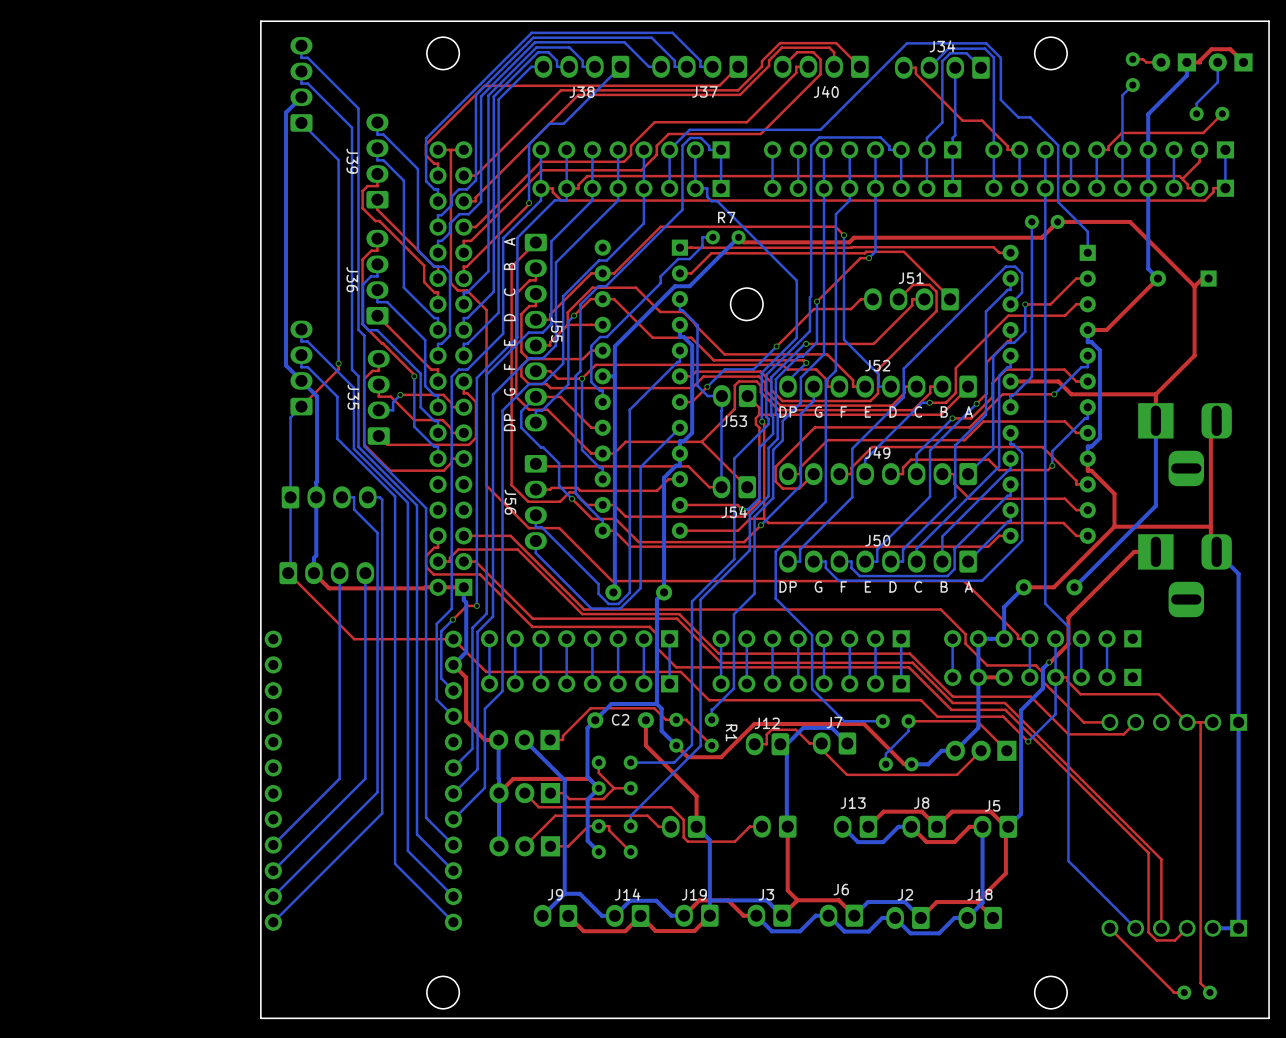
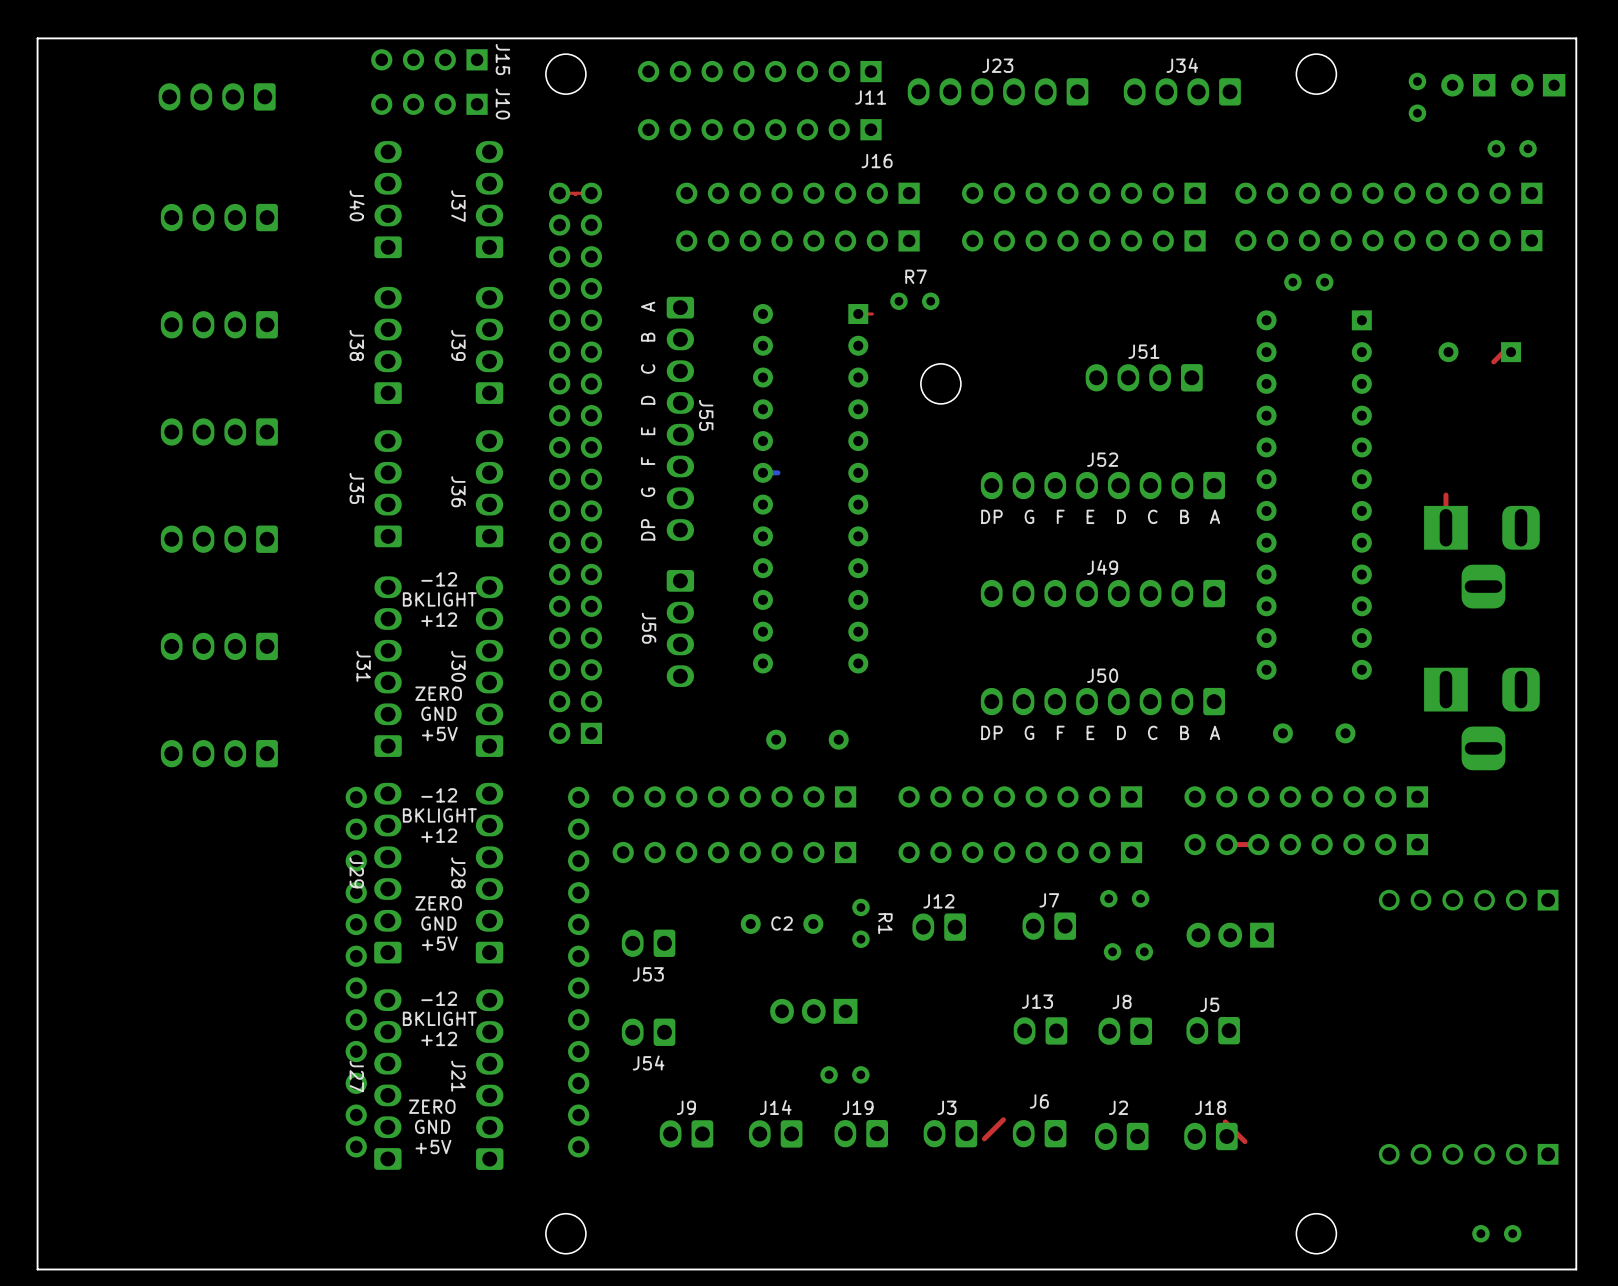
board edge: (1269, 21) (260, 21) (260, 1018) (1269, 1018) (1269, 21) -> (1576, 38) (1576, 1269) (37, 1269) (37, 38) (1576, 38)
J15: none -> (429, 59)
bottom track: (301, 45) (301, 57) (307, 57) (358, 108) (358, 329) (364, 335) (364, 446) (426, 508) (426, 817) (453, 845) -> none
J11: none -> (759, 71)
top track: (1132, 59) (1143, 59) (1146, 62) (1161, 62) -> none
bottom track: (1186, 62) (1186, 75) (1148, 114) (1148, 268) (1157, 278) -> none
bottom track: (1217, 62) (1217, 82) (1196, 103) (1196, 113) -> none
top track: (1243, 62) (1230, 49) (1211, 49) (1200, 62) (1186, 62) -> none
bottom track: (543, 66) (531, 66) (498, 99) (498, 312) (467, 343) (463, 343) (463, 355) -> none
bottom track: (569, 66) (557, 66) (557, 60) (548, 52) (538, 52) (493, 96) (493, 291) (467, 318) (463, 318) (463, 330) -> none
J38 rotation: 0° (581, 66) -> 90° clockwise (388, 345)
J38 position: (581, 66) -> (388, 345)
bottom track: (594, 66) (582, 66) (582, 60) (569, 47) (536, 47) (488, 95) (488, 271) (467, 292) (463, 292) (463, 304) -> none
bottom track: (620, 66) (563, 123) (549, 123) (529, 144) (529, 203) -> none
bottom track: (661, 66) (649, 66) (624, 42) (535, 42) (481, 96) (481, 201) (468, 214) (459, 214) (449, 223) (449, 232) (441, 240) (438, 240) (438, 252) -> none
bottom track: (686, 66) (674, 66) (674, 60) (651, 37) (533, 37) (475, 95) (475, 180) (466, 189) (458, 189) (451, 196) (451, 205) (441, 215) (438, 215) (438, 227) -> none
J37 rotation: 0° (699, 66) -> 90° clockwise (489, 199)
J37 position: (699, 66) -> (489, 199)
bottom track: (712, 66) (700, 66) (700, 60) (672, 32) (531, 32) (426, 138) (426, 181) (434, 189) (438, 189) (438, 201) -> none
top track: (738, 66) (719, 85) (484, 85) (425, 144) (425, 155) (434, 163) (438, 163) (438, 175) -> none
top track: (782, 66) (797, 52) (813, 52) (820, 59) (820, 74) (760, 134) (668, 134) (656, 145) (656, 154) (641, 170) (541, 170) (471, 240) (463, 240) (463, 252) -> none
top track: (808, 66) (796, 66) (796, 72) (746, 122) (654, 122) (631, 145) (631, 154) (624, 161) (540, 161) (475, 227) (463, 227) -> none
J40 rotation: 0° (821, 66) -> 90° clockwise (388, 199)
J40 position: (821, 66) -> (388, 199)
top track: (834, 66) (834, 52) (829, 47) (781, 47) (769, 60) (769, 65) (740, 94) (578, 94) (475, 197) (475, 201) (463, 201) -> none
top track: (859, 66) (836, 43) (779, 43) (762, 61) (762, 66) (738, 90) (560, 90) (475, 175) (463, 175) -> none
J23: none -> (998, 91)
top track: (903, 67) (915, 67) (915, 73) (962, 120) (982, 120) (1007, 146) (1007, 149) (1019, 149) -> none
bottom track: (929, 67) (948, 48) (984, 48) (993, 57) (993, 188) -> none
bottom track: (955, 67) (952, 188) -> none
bottom track: (980, 67) (966, 53) (950, 53) (942, 61) (942, 122) (926, 137) (926, 188) -> none
part: none -> (217, 96)
bottom track: (301, 71) (301, 83) (307, 83) (352, 127) (352, 369) (358, 376) (358, 446) (417, 505) (417, 834) (453, 870) -> none
J10: none -> (429, 104)
part: (301, 84) -> none
bottom track: (1132, 85) (1122, 95) (1122, 188) -> none
bottom track: (301, 97) (286, 112) (286, 365) (317, 396) (316, 555) (313, 557) (313, 573) -> none
J16: none -> (759, 129)
top track: (1222, 113) (1203, 132) (1121, 132) (1108, 146) (1108, 149) (1096, 149) -> none
bottom track: (301, 122) (338, 160) (338, 363) -> none
bottom track: (377, 122) (377, 134) (383, 134) (417, 169) (417, 250) (434, 266) (443, 266) (449, 272) (449, 335) (441, 343) (438, 343) (438, 355) -> none
bottom track: (377, 148) (377, 160) (383, 160) (403, 180) (403, 287) (434, 318) (438, 318) (438, 330) -> none
bottom track: (540, 149) (540, 200) (503, 238) (503, 333) (467, 369) (458, 369) (451, 376) (451, 608) (436, 623) (436, 699) (453, 716) -> none
bottom track: (566, 149) (566, 200) (554, 200) (517, 237) (517, 337) (476, 377) (476, 605) -> none
bottom track: (592, 149) (592, 200) (551, 241) (551, 323) (542, 332) (528, 332) (486, 374) (486, 613) (472, 627) (472, 748) (453, 767) -> none
bottom track: (618, 149) (618, 200) (555, 262) (555, 345) (543, 358) (529, 358) (492, 394) (492, 616) (477, 631) (477, 769) (453, 793) -> none
bottom track: (643, 149) (643, 223) (606, 260) (598, 260) (563, 296) (563, 363) (542, 384) (529, 384) (502, 410) (502, 691) (484, 708) (484, 787) (453, 819) -> none
bottom track: (695, 149) (695, 188) (707, 188) (707, 196) (711, 201) (717, 201) (796, 280) (796, 337) (761, 372) (762, 421) -> none
bottom track: (772, 149) (772, 188) -> none
bottom track: (798, 149) (798, 188) -> none
bottom track: (824, 149) (824, 354) (800, 377) (800, 402) (782, 421) (782, 440) (773, 449) (773, 498) (754, 516) (754, 593) (733, 614) (733, 688) (711, 709) (711, 719) -> none
bottom track: (849, 149) (849, 200) (835, 214) (835, 370) (825, 380) (825, 501) (775, 551) (775, 598) (812, 634) (812, 689) (844, 721) (882, 721) -> none
bottom track: (875, 149) (875, 251) (868, 258) -> none
bottom track: (1019, 149) (1019, 188) -> none
bottom track: (1045, 149) (1045, 603) (1068, 626) (1068, 861) (1135, 928) -> none
bottom track: (1071, 149) (1071, 188) -> none
bottom track: (1096, 149) (1096, 188) -> none
bottom track: (1173, 149) (1173, 188) -> none
top track: (1199, 149) (1199, 161) (1182, 179) -> none
bottom track: (1225, 149) (1225, 188) -> none
top track: (450, 150) (450, 283) (457, 290) (466, 290) (486, 310) (486, 485) (528, 528) (559, 528) (612, 581) (963, 581) (1017, 635) (1017, 638) (1029, 638) -> none
J39 position: (377, 161) -> (489, 345)
part: none -> (219, 217)
top track: (377, 174) (377, 186) (367, 186) (362, 191) (362, 208) (375, 221) (379, 221) (424, 265) (424, 282) (434, 292) (438, 292) (438, 304) -> none
bottom track: (669, 188) (669, 149) (689, 129) (820, 129) (906, 43) (986, 43) (1000, 57) (1000, 99) (1018, 117) (1030, 117) (1058, 145) (1058, 202) (1087, 231) (1087, 252) -> none
bottom track: (721, 188) (721, 149) (709, 149) (709, 146) (700, 137) (690, 137) (682, 145) (682, 209) (605, 286) (598, 286) (580, 304) (580, 371) (575, 376) (575, 493) (602, 519) (602, 530) -> none
bottom track: (901, 188) (901, 149) (889, 149) (889, 146) (880, 137) (819, 137) (811, 145) (809, 331) (766, 374) (766, 416) (768, 419) (768, 424) (734, 458) (734, 559) (691, 601) (691, 744) (674, 762) (630, 762) -> none
top track: (1199, 188) (1187, 188) (1187, 184) (1179, 176) (587, 176) (578, 184) (578, 188) (566, 188) -> none
top track: (1225, 188) (1213, 188) (1213, 191) (1204, 200) (561, 200) (552, 192) (552, 188) (540, 188) -> none
top track: (377, 199) (377, 209) (434, 266) (438, 266) (438, 278) -> none
top track: (529, 203) (466, 266) (463, 266) (463, 278) -> none
via: (529, 203) -> none
bottom track: (1031, 221) (1031, 376) (1012, 395) (1010, 395) (1010, 407) -> none
top track: (843, 235) (835, 226) (660, 226) (614, 273) (591, 273) (550, 314) (550, 319) (535, 319) -> none
bottom track: (843, 235) (843, 339) (878, 374) (878, 386) (890, 386) -> none
via: (843, 235) -> none
bottom track: (712, 237) (702, 237) (702, 246) (689, 259) (678, 259) (660, 276) (660, 283) (606, 336) (600, 336) (591, 345) (591, 382) (599, 390) (602, 390) (602, 402) -> none
top track: (738, 237) (743, 242) (849, 242) (853, 237) (1041, 237) (1057, 221) (1130, 221) (1194, 286) (1194, 355) (1155, 394) (1071, 394) (1058, 381) (1010, 381) -> none
bottom track: (738, 237) (689, 286) (674, 286) (614, 346) (613, 592) -> none
top track: (377, 238) (377, 250) (371, 250) (362, 259) (362, 324) (414, 376) -> none
top track: (535, 242) (511, 266) (511, 485) (528, 501) (560, 501) (569, 492) (574, 492) (587, 504) (614, 504) (625, 516) (744, 516) (759, 501) (759, 427) (755, 424) (755, 418) (759, 414) -> none
top track: (691, 247) (993, 247) (999, 252) (1010, 252) -> none
part: none -> (219, 324)
top track: (868, 258) (860, 258) (816, 301) -> none
via: (868, 258) -> none
bottom track: (377, 264) (377, 276) (371, 276) (363, 284) (363, 324) (368, 330) (377, 330) (420, 373) (420, 407) (434, 421) (438, 421) (438, 432) -> none
top track: (535, 268) (535, 280) (529, 280) (516, 293) (516, 397) (529, 409) (547, 409) (591, 453) (614, 453) (625, 441) (701, 441) -> none
top track: (679, 273) (691, 273) (711, 253) (903, 251) (950, 299) -> none
J36 position: (377, 277) -> (489, 488)
bottom track: (1010, 278) (1010, 289) (1007, 289) (985, 311) (985, 414) (955, 445) (955, 497) (903, 549) (903, 561) (890, 561) -> none
top track: (1087, 278) (1076, 278) (1050, 304) (1025, 304) -> none
top track: (1157, 278) (1106, 330) (1087, 330) -> none
bottom track: (377, 290) (377, 302) (387, 302) (425, 340) (425, 386) (434, 395) (438, 395) (438, 407) -> none
top track: (535, 293) (535, 306) (529, 306) (521, 314) (521, 351) (528, 359) -> none
bottom track: (679, 299) (679, 310) (682, 310) (697, 325) (697, 385) (707, 396) (721, 396) (721, 487) -> none
top track: (872, 299) (860, 299) (851, 309) (814, 309) (776, 346) -> none
top track: (898, 299) (913, 284) (929, 284) (936, 291) (936, 311) (878, 369) (878, 393) (870, 401) (782, 401) (771, 389) (771, 382) (760, 371) (695, 371) (691, 376) (679, 376) -> none
top track: (924, 299) (912, 299) (912, 305) (873, 343) (806, 343) -> none
bottom track: (816, 301) (816, 342) (802, 356) (798, 356) (775, 379) (777, 438) (768, 447) (768, 496) (749, 514) (749, 550) (700, 599) (700, 745) (630, 815) (630, 826) -> none
via: (816, 301) -> none
bottom track: (1010, 304) (1022, 292) (1022, 273) (1015, 266) (1005, 266) (903, 368) (903, 397) (852, 448) (852, 497) (800, 549) (800, 561) (787, 561) -> none
bottom track: (1025, 304) (1025, 331) (1014, 342) (1006, 342) (993, 356) (993, 449) (968, 474) -> none
via: (1025, 304) -> none
top track: (1087, 304) (1076, 304) (1064, 315) (1008, 315) (955, 368) (955, 392) (946, 402) (929, 402) -> none
top track: (377, 315) (431, 369) (438, 369) (438, 381) -> none
top track: (574, 315) (590, 299) (614, 299) (652, 337) (691, 337) (713, 360) (803, 360) (806, 362) -> none
bottom track: (574, 315) (568, 321) (568, 384) (542, 410) (535, 410) (535, 422) -> none
via: (574, 315) -> none
top track: (567, 324) (567, 312) (592, 287) (636, 287) (660, 312) (683, 312) (724, 354) (827, 354) (853, 380) (853, 386) (865, 386) -> none
top track: (567, 324) (550, 342) (550, 345) (535, 345) -> none
top track: (602, 324) (567, 324) -> none
bottom track: (679, 324) (679, 337) (683, 337) (692, 345) (692, 432) (683, 441) (679, 441) (679, 465) (676, 465) (664, 477) (664, 592) (656, 599) (656, 704) -> none
bottom track: (301, 329) (301, 341) (307, 341) (353, 387) (353, 448) (407, 502) (407, 850) (453, 896) -> none
top track: (1010, 330) (1010, 341) (1007, 341) (986, 362) (986, 393) (976, 403) -> none
bottom track: (1087, 330) (1087, 342) (1091, 342) (1099, 350) (1099, 438) (1091, 446) (1087, 446) (1087, 458) -> none
part: none -> (219, 432)
bottom track: (806, 343) (771, 377) (773, 433) (759, 447) (759, 498) (748, 509) (742, 509) -> none
via: (806, 343) -> none
bottom track: (776, 346) (753, 369) (724, 369) (707, 386) -> none
via: (776, 346) -> none
top track: (602, 350) (591, 350) (582, 359) (528, 359) -> none
bottom track: (679, 350) (679, 361) (677, 361) (629, 409) (629, 592) (618, 603) (608, 603) (598, 593) (598, 584) (541, 527) (535, 527) (535, 515) -> none
bottom track: (301, 355) (301, 367) (307, 367) (337, 396) (337, 438) (395, 496) (395, 863) (453, 922) -> none
bottom track: (1010, 355) (1010, 367) (1007, 367) (999, 375) (999, 466) (916, 547) (916, 561) -> none
bottom track: (1087, 355) (1087, 367) (1081, 367) (1054, 394) -> none
top track: (378, 358) (378, 370) (372, 370) (364, 379) (364, 444) (390, 470) (443, 470) (451, 462) (451, 458) (463, 458) -> none
top track: (528, 359) (521, 366) (521, 376) (529, 384) (546, 384) (550, 388) (692, 388) (703, 376) (758, 376) (765, 383) (765, 390) (780, 405) (891, 405) (904, 393) (904, 386) (916, 386) -> none
bottom track: (806, 362) (787, 381) (787, 386) -> none
via: (806, 362) -> none
top track: (338, 363) (338, 369) (301, 406) -> none
via: (338, 363) -> none
part: (301, 368) -> none
top track: (535, 371) (550, 371) (557, 378) (582, 378) (595, 364) (782, 364) (787, 369) (816, 369) (827, 380) (827, 386) (839, 386) -> none
bottom track: (414, 376) (414, 426) (434, 446) (438, 446) (438, 458) -> none
via: (414, 376) -> none
bottom track: (582, 378) (582, 450) (599, 467) (602, 467) (602, 479) -> none
via: (582, 378) -> none
top track: (463, 381) (463, 393) (467, 393) (475, 401) (475, 437) (468, 444) (387, 444) (378, 436) -> none
top track: (1087, 381) (1076, 381) (1064, 369) (1006, 369) (992, 383) (992, 397) (971, 418) (952, 418) -> none
top track: (378, 384) (378, 396) (390, 396) (414, 420) (442, 420) (451, 429) (451, 432) (463, 432) -> none
top track: (707, 386) (692, 402) (679, 402) -> none
via: (707, 386) -> none
bottom track: (813, 386) (813, 401) (800, 413) (800, 485) (760, 525) -> none
top track: (942, 386) (930, 386) (930, 393) (913, 410) (778, 410) (760, 392) (760, 385) (756, 381) (738, 381) (734, 385) (734, 408) (701, 441) -> none
top track: (968, 386) (941, 414) (759, 414) -> none
top track: (400, 394) (443, 394) (451, 403) (451, 407) (463, 407) -> none
bottom track: (400, 394) (393, 402) (393, 410) (378, 410) -> none
via: (400, 394) -> none
top track: (1054, 394) (1002, 394) (969, 427) (815, 427) (775, 466) (775, 481) (782, 488) (799, 488) (813, 474) -> none
via: (1054, 394) -> none
top track: (535, 396) (560, 396) (591, 427) (602, 427) -> none
bottom track: (535, 396) (521, 411) (521, 427) (559, 463) (559, 485) (572, 498) -> none
J53 position: (734, 396) -> (648, 943)
top track: (747, 396) (759, 407) (759, 414) -> none
J35 position: (378, 397) -> (388, 488)
bottom track: (929, 402) (922, 402) (865, 459) (865, 474) -> none
via: (929, 402) -> none
bottom track: (976, 403) (930, 450) (930, 496) (877, 549) (877, 561) (865, 561) -> none
via: (976, 403) -> none
bottom track: (301, 406) (290, 417) (290, 570) (288, 573) -> none
bottom track: (1087, 407) (1087, 418) (1084, 418) (1052, 451) (1052, 465) -> none
bottom track: (952, 418) (916, 454) (916, 474) -> none
via: (952, 418) -> none
bottom track: (1155, 420) (1155, 505) (1074, 587) -> none
top track: (1216, 420) (1210, 426) (1210, 546) (1216, 551) -> none
top track: (762, 421) (764, 423) (764, 518) -> none
via: (762, 421) -> none
bottom track: (679, 427) (640, 467) (640, 588) (620, 608) (591, 608) (535, 553) (535, 541) -> none
part: none -> (219, 539)
bottom track: (1010, 432) (1010, 444) (1013, 444) (1022, 453) (1022, 540) (982, 580) (838, 580) (825, 567) (825, 561) (813, 561) -> none
top track: (1087, 432) (1076, 432) (1064, 421) (983, 421) (964, 440) (827, 440) (800, 467) (800, 474) (787, 474) -> none
top track: (701, 441) (747, 487) -> none
bottom track: (1010, 458) (1010, 470) (942, 536) (942, 561) -> none
top track: (1087, 458) (1087, 470) (1091, 470) (1114, 493) (1114, 526) -> none
text: none -> -12 (439, 579)
top track: (535, 463) (538, 466) (688, 466) (709, 487) (721, 487) -> none
top track: (1052, 465) (1048, 470) (999, 470) (988, 459) (911, 459) (903, 467) (903, 474) (890, 474) -> none
via: (1052, 465) -> none
top track: (839, 474) (851, 474) (851, 467) (872, 447) (1042, 447) (1076, 480) (1076, 484) (1087, 484) -> none
top track: (942, 474) (954, 474) (954, 483) (969, 498) (1064, 498) (1076, 510) (1087, 510) -> none
text: none -> BKLIGHT (439, 599)
top track: (679, 479) (668, 479) (656, 490) (580, 490) (577, 487) (535, 489) -> none
bottom track: (1010, 484) (1010, 495) (1007, 495) (954, 548) (954, 568) (947, 576) (859, 576) (851, 567) (851, 561) (839, 561) -> none
J54 position: (734, 487) -> (648, 1032)
text: none -> +12 (439, 619)
part: (329, 497) -> none
bottom track: (341, 497) (354, 497) (354, 509) (377, 532) (377, 792) (273, 896) -> none
bottom track: (367, 497) (379, 497) (382, 499) (382, 813) (273, 922) -> none
top track: (572, 498) (592, 518) (615, 518) (638, 542) (744, 542) (760, 525) -> none
via: (572, 498) -> none
top track: (679, 504) (737, 504) (742, 509) -> none
via: (742, 509) -> none
bottom track: (1010, 510) (1010, 521) (1008, 521) (968, 561) -> none
part: none -> (219, 646)
top track: (764, 518) (750, 518) (738, 530) (679, 530) -> none
top track: (764, 518) (768, 522) (1063, 522) (1076, 535) (1087, 535) -> none
via: (760, 525) -> none
top track: (1114, 526) (1053, 587) (1023, 587) -> none
top track: (1210, 526) (1114, 526) -> none
top track: (602, 530) (614, 530) (630, 546) (988, 546) (999, 535) (1010, 535) -> none
J31: none -> (388, 666)
J30: none -> (489, 666)
top track: (438, 535) (438, 547) (434, 547) (426, 555) (426, 566) (433, 574) (480, 574) (532, 626) (649, 626) (657, 635) (657, 648) (676, 667) (908, 667) (951, 709) (1005, 709) (1148, 853) (1148, 932) (1156, 940) (1174, 940) (1187, 928) -> none
top track: (463, 535) (510, 535) (584, 609) (940, 609) (965, 634) (965, 643) (987, 665) (1035, 665) (1042, 672) (1042, 681) (1083, 722) (1109, 722) -> none
top track: (1155, 551) (1134, 551) (1068, 617) (1068, 644) (1049, 662) -> none
bottom track: (1216, 551) (1238, 573) (1238, 928) (1212, 928) -> none
text: none -> ZERO (438, 693)
top track: (438, 561) (449, 561) (449, 557) (458, 549) (517, 549) (582, 614) (679, 614) (718, 653) (909, 653) (952, 696) (1030, 696) (1068, 734) (1123, 734) (1135, 722) -> none
top track: (463, 561) (475, 561) (532, 618) (676, 618) (721, 662) (912, 662) (952, 703) (1004, 703) (1161, 859) (1161, 928) -> none
text: none -> GND (438, 713)
top track: (288, 573) (354, 639) (453, 639) (486, 671) (680, 671) (709, 700) (921, 700) (937, 716) (1003, 716) (1028, 741) -> none
top track: (313, 573) (329, 588) (463, 587) -> none
part: (326, 573) -> none
bottom track: (339, 573) (339, 778) (273, 845) -> none
bottom track: (365, 573) (365, 778) (273, 870) -> none
text: none -> +5V (439, 733)
bottom track: (463, 587) (463, 599) (466, 602) (466, 652) (453, 664) -> none
bottom track: (1023, 587) (1004, 607) (1004, 638) (978, 638) (978, 727) (955, 750) (941, 750) (928, 764) (911, 764) -> none
part: none -> (219, 753)
top track: (476, 605) (466, 605) (452, 619) -> none
via: (476, 605) -> none
bottom track: (452, 619) (441, 631) (441, 678) (453, 690) -> none
via: (452, 619) -> none
text: none -> -12 (439, 795)
bottom track: (489, 638) (489, 683) -> none
bottom track: (515, 638) (515, 683) -> none
bottom track: (540, 638) (540, 683) -> none
bottom track: (566, 638) (566, 683) -> none
bottom track: (592, 638) (592, 683) -> none
bottom track: (618, 638) (618, 683) -> none
bottom track: (643, 638) (643, 683) -> none
bottom track: (669, 638) (669, 683) -> none
bottom track: (721, 638) (721, 683) -> none
bottom track: (746, 638) (746, 683) -> none
bottom track: (772, 638) (772, 683) -> none
bottom track: (798, 638) (798, 683) -> none
bottom track: (824, 638) (824, 683) -> none
bottom track: (849, 638) (849, 683) -> none
bottom track: (875, 638) (875, 683) -> none
bottom track: (901, 638) (901, 683) -> none
bottom track: (952, 638) (952, 677) -> none
bottom track: (1029, 638) (1029, 677) -> none
bottom track: (1055, 638) (1055, 714) (1028, 741) -> none
bottom track: (1081, 638) (1081, 677) -> none
bottom track: (1107, 638) (1107, 677) -> none
text: none -> BKLIGHT (439, 815)
bottom track: (1049, 662) (1042, 668) (1042, 688) (1021, 710) (1021, 814) (1008, 826) -> none
via: (1049, 662) -> none
top track: (453, 664) (466, 677) (466, 721) (484, 739) (498, 739) -> none
text: none -> +12 (439, 835)
top track: (1055, 677) (1067, 677) (1067, 681) (1080, 694) (1158, 694) (1187, 722) (1212, 722) -> none
J29: none -> (387, 873)
J28: none -> (489, 873)
bottom track: (656, 704) (661, 708) (661, 730) (676, 745) -> none
bottom track: (656, 704) (611, 704) (587, 728) (587, 777) (598, 788) (587, 799) (587, 840) (598, 851) -> none
C2 position: (620, 720) -> (782, 923)
top track: (645, 720) (645, 745) (696, 796) (696, 826) -> none
top track: (908, 721) (977, 721) (1006, 750) -> none
bottom track: (908, 721) (908, 731) (885, 753) (885, 764) -> none
top track: (1200, 722) (1200, 983) (1209, 992) -> none
text: none -> ZERO (438, 903)
part: (676, 732) -> none
R1 position: (711, 732) -> (860, 923)
bottom track: (498, 739) (499, 846) -> none
bottom track: (524, 739) (564, 780) (564, 893) -> none
part: (524, 739) -> none
top track: (550, 739) (563, 739) (563, 735) (590, 708) (654, 708) (665, 719) (686, 719) (711, 745) -> none
text: none -> GND (438, 923)
via: (1028, 741) -> none
top track: (815, 743) (847, 774) (957, 774) (981, 750) -> none
top track: (821, 743) (809, 743) (795, 729) (771, 729) (766, 734) (766, 744) (754, 744) -> none
bottom track: (847, 743) (831, 727) (803, 727) (786, 744) -> none
J12 position: (767, 744) -> (939, 927)
bottom track: (786, 744) (787, 826) -> none
top track: (676, 745) (687, 757) (721, 757) (754, 724) (864, 724) (904, 764) (911, 764) -> none
text: none -> +5V (439, 943)
top track: (598, 762) (598, 772) (614, 788) -> none
part: (598, 775) -> none
part: (630, 775) -> none
top track: (598, 788) (589, 778) (513, 778) (499, 793) -> none
top track: (614, 788) (603, 799) (569, 799) (563, 793) (550, 793) -> none
top track: (630, 788) (614, 788) -> none
top track: (524, 793) (538, 807) (670, 807) (683, 819) (683, 837) (687, 841) (734, 841) (749, 826) (762, 826) -> none
part: (524, 793) -> none
text: none -> -12 (439, 998)
part: none -> (813, 1011)
text: none -> BKLIGHT (439, 1018)
top track: (670, 826) (658, 826) (647, 815) (555, 815) (524, 846) -> none
part: (683, 826) -> none
bottom track: (696, 826) (709, 840) (709, 915) -> none
part: (774, 826) -> none
top track: (787, 826) (787, 890) (797, 900) (838, 900) (854, 915) -> none
J13 position: (855, 826) -> (1040, 1030)
bottom track: (911, 826) (898, 826) (883, 842) (858, 842) (842, 826) -> none
J8 position: (924, 826) -> (1125, 1031)
top track: (982, 826) (969, 826) (954, 842) (926, 842) (911, 826) -> none
bottom track: (982, 826) (982, 902) (967, 917) (954, 917) (939, 933) (910, 933) (895, 917) (882, 917) (868, 931) (844, 931) (828, 915) (815, 915) (800, 931) (771, 931) (756, 915) -> none
J5 position: (995, 826) -> (1213, 1030)
top track: (1005, 826) (990, 811) (952, 811) (937, 826) (921, 811) (883, 811) (868, 826) -> none
top track: (1005, 826) (1005, 873) (977, 902) (936, 902) (920, 917) -> none
text: none -> +12 (439, 1038)
part: (598, 839) -> none
part: (630, 839) -> none
part: (524, 846) -> none
top track: (550, 846) (568, 846) (588, 826) (609, 826) (609, 830) (630, 851) -> none
part: none -> (844, 1074)
J27: none -> (387, 1079)
J21: none -> (489, 1079)
text: none -> ZERO (432, 1106)
bottom track: (564, 893) (542, 915) -> none
bottom track: (564, 893) (579, 893) (601, 915) (614, 915) (629, 900) (656, 900) (671, 915) (684, 915) -> none
bottom track: (709, 900) (766, 900) (782, 915) -> none
text: none -> GND (432, 1126)
J9 position: (555, 915) -> (686, 1133)
J14 position: (627, 915) -> (775, 1133)
J19 position: (696, 915) -> (861, 1133)
top track: (709, 915) (694, 931) (655, 931) (640, 915) (625, 931) (583, 931) (568, 915) -> none
top track: (756, 915) (743, 915) (728, 900) (699, 900) (684, 915) -> none
J3 position: (769, 915) -> (950, 1133)
J6 position: (841, 915) -> (1039, 1133)
bottom track: (854, 915) (868, 901) (904, 901) (920, 917) -> none
J2 position: (907, 917) -> (1121, 1136)
J18 position: (980, 917) -> (1210, 1136)
text: none -> +5V (433, 1146)
top track: (1109, 928) (1173, 992) (1184, 992) -> none

